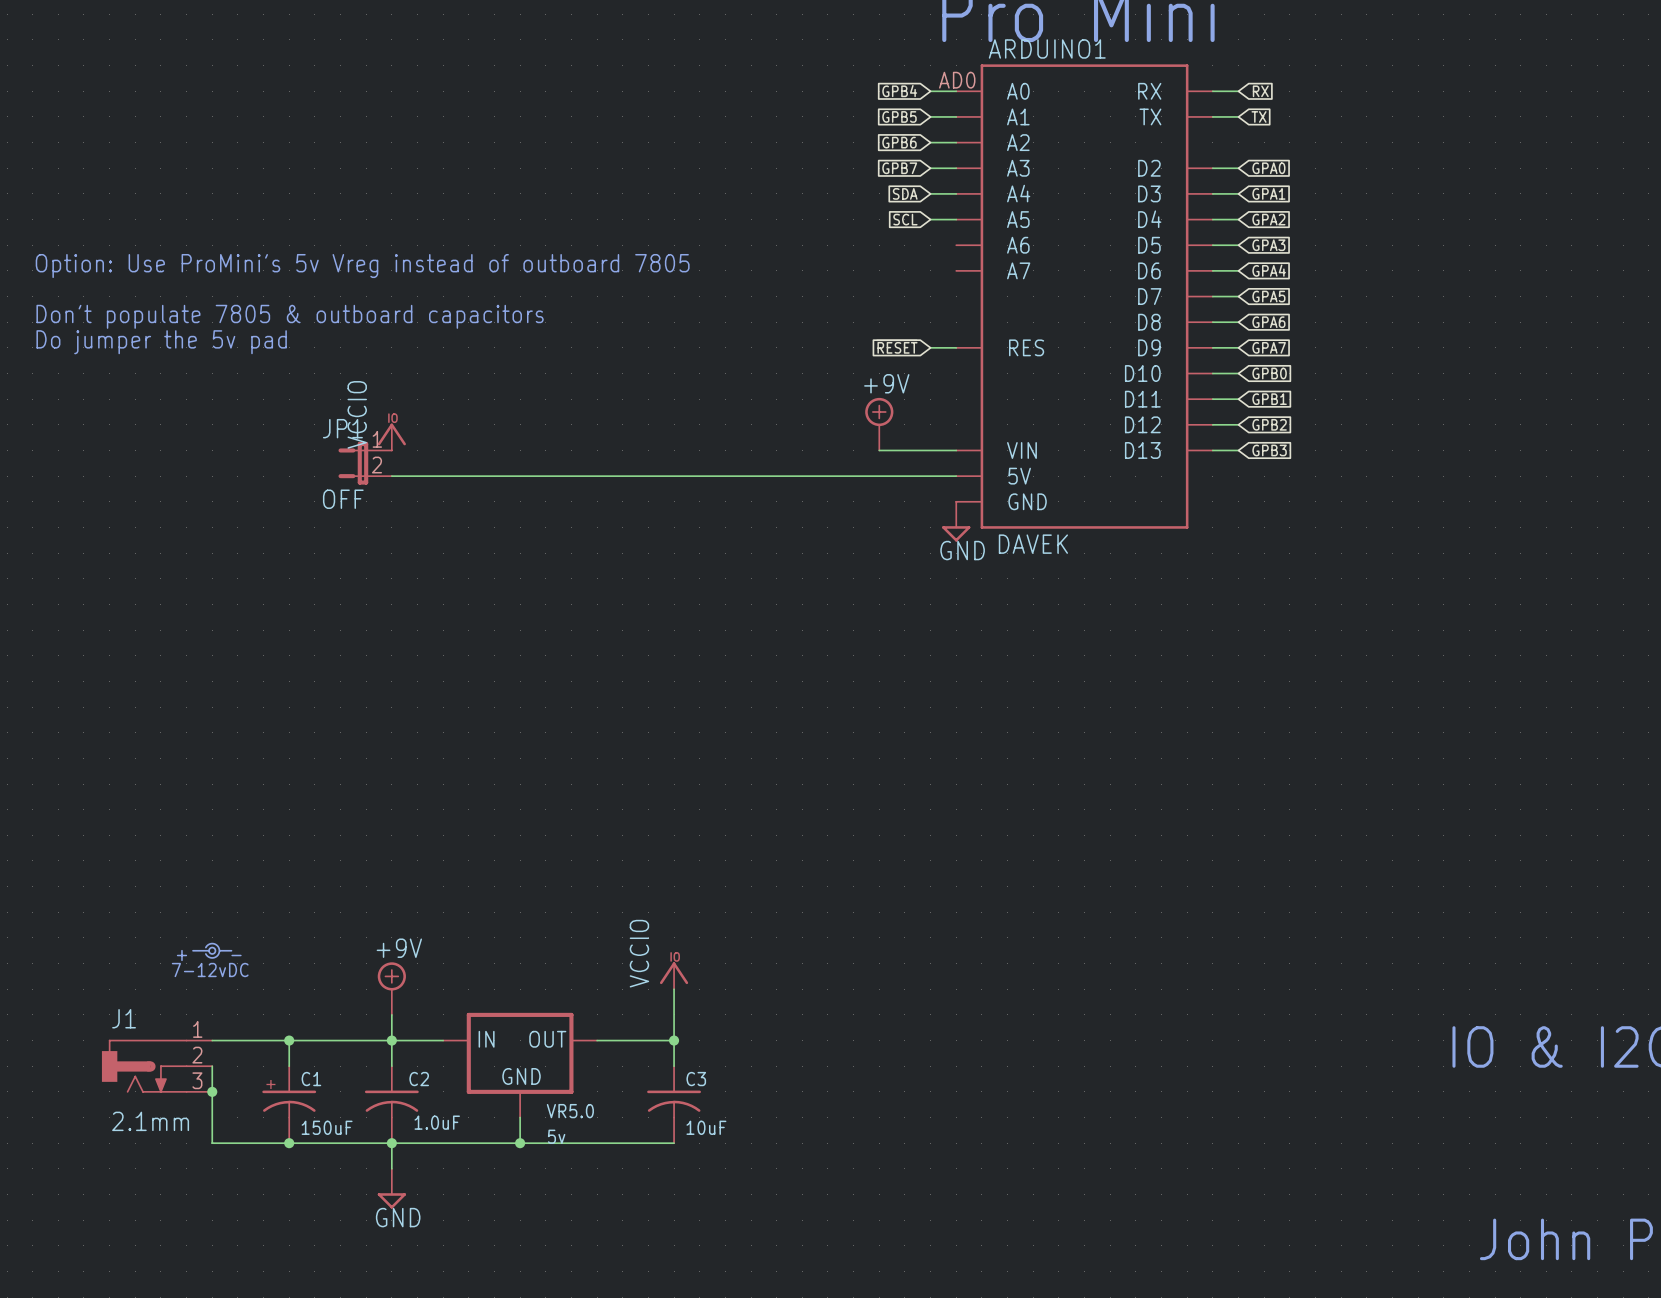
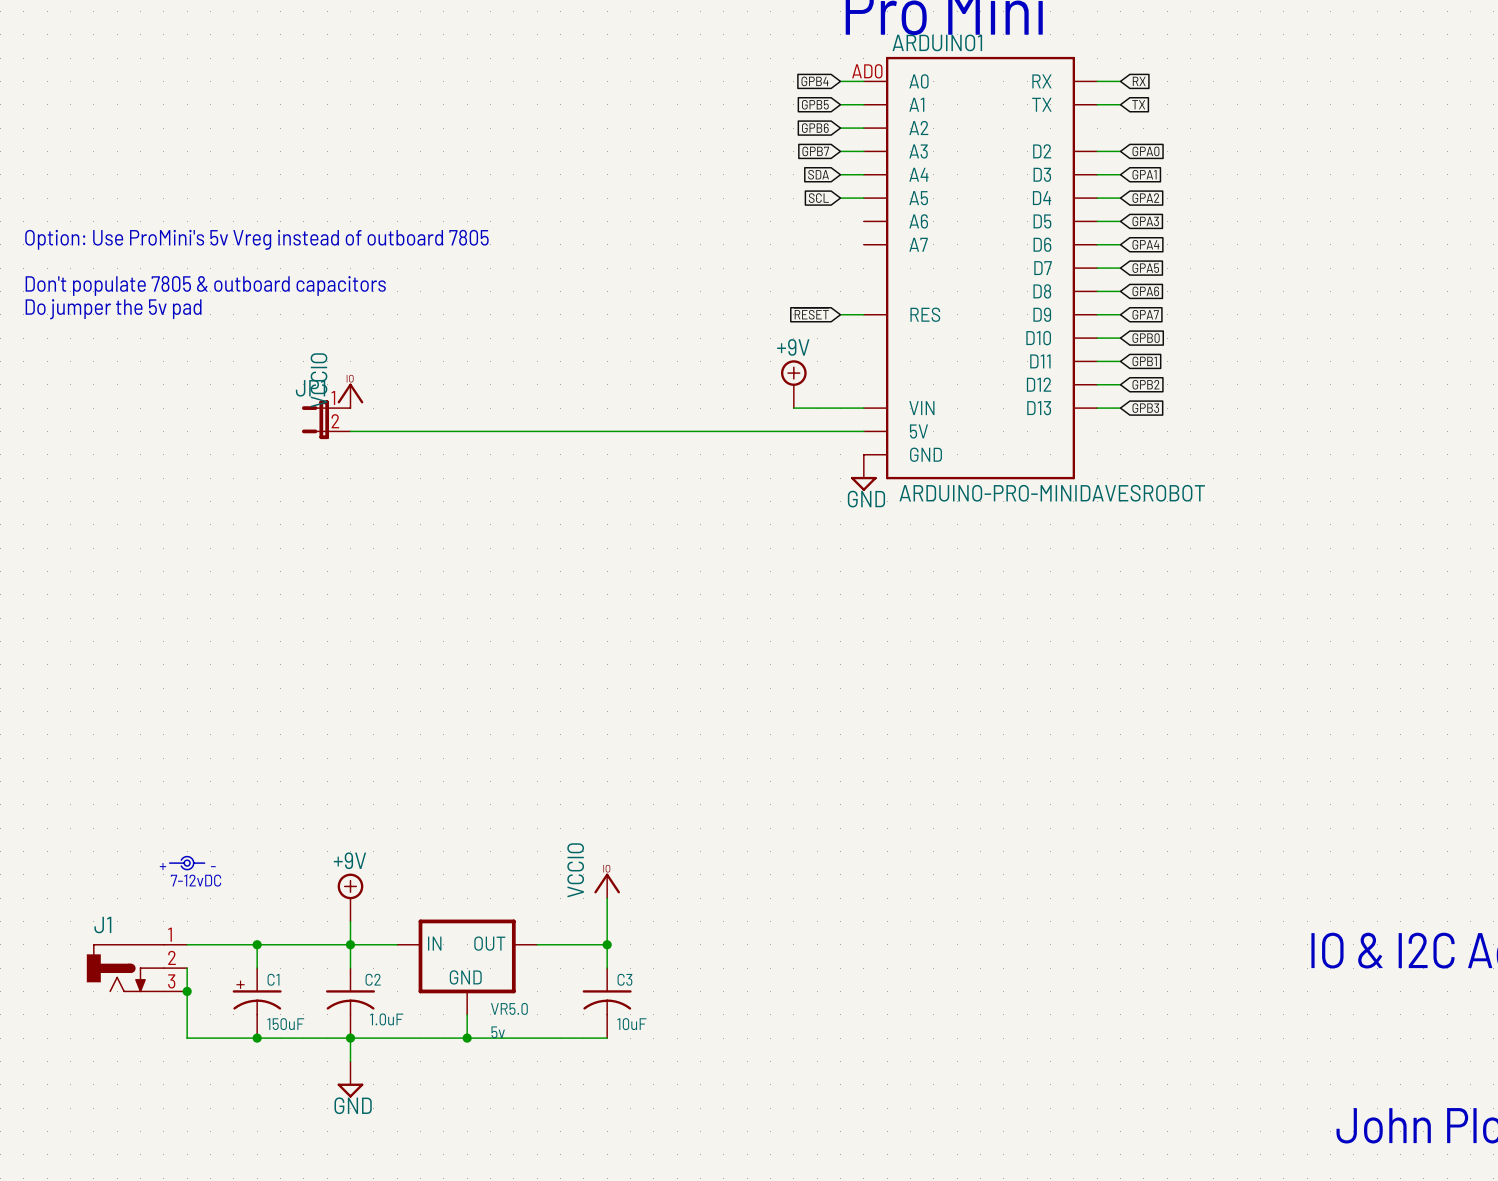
JP1 value: OFF (343, 499) -> none
ARDUINO1 value: DAVEK (1033, 544) -> ARDUINO-PRO-MINIDAVESROBOT (1052, 493)
J1 value: 2.1mm (150, 1121) -> none

